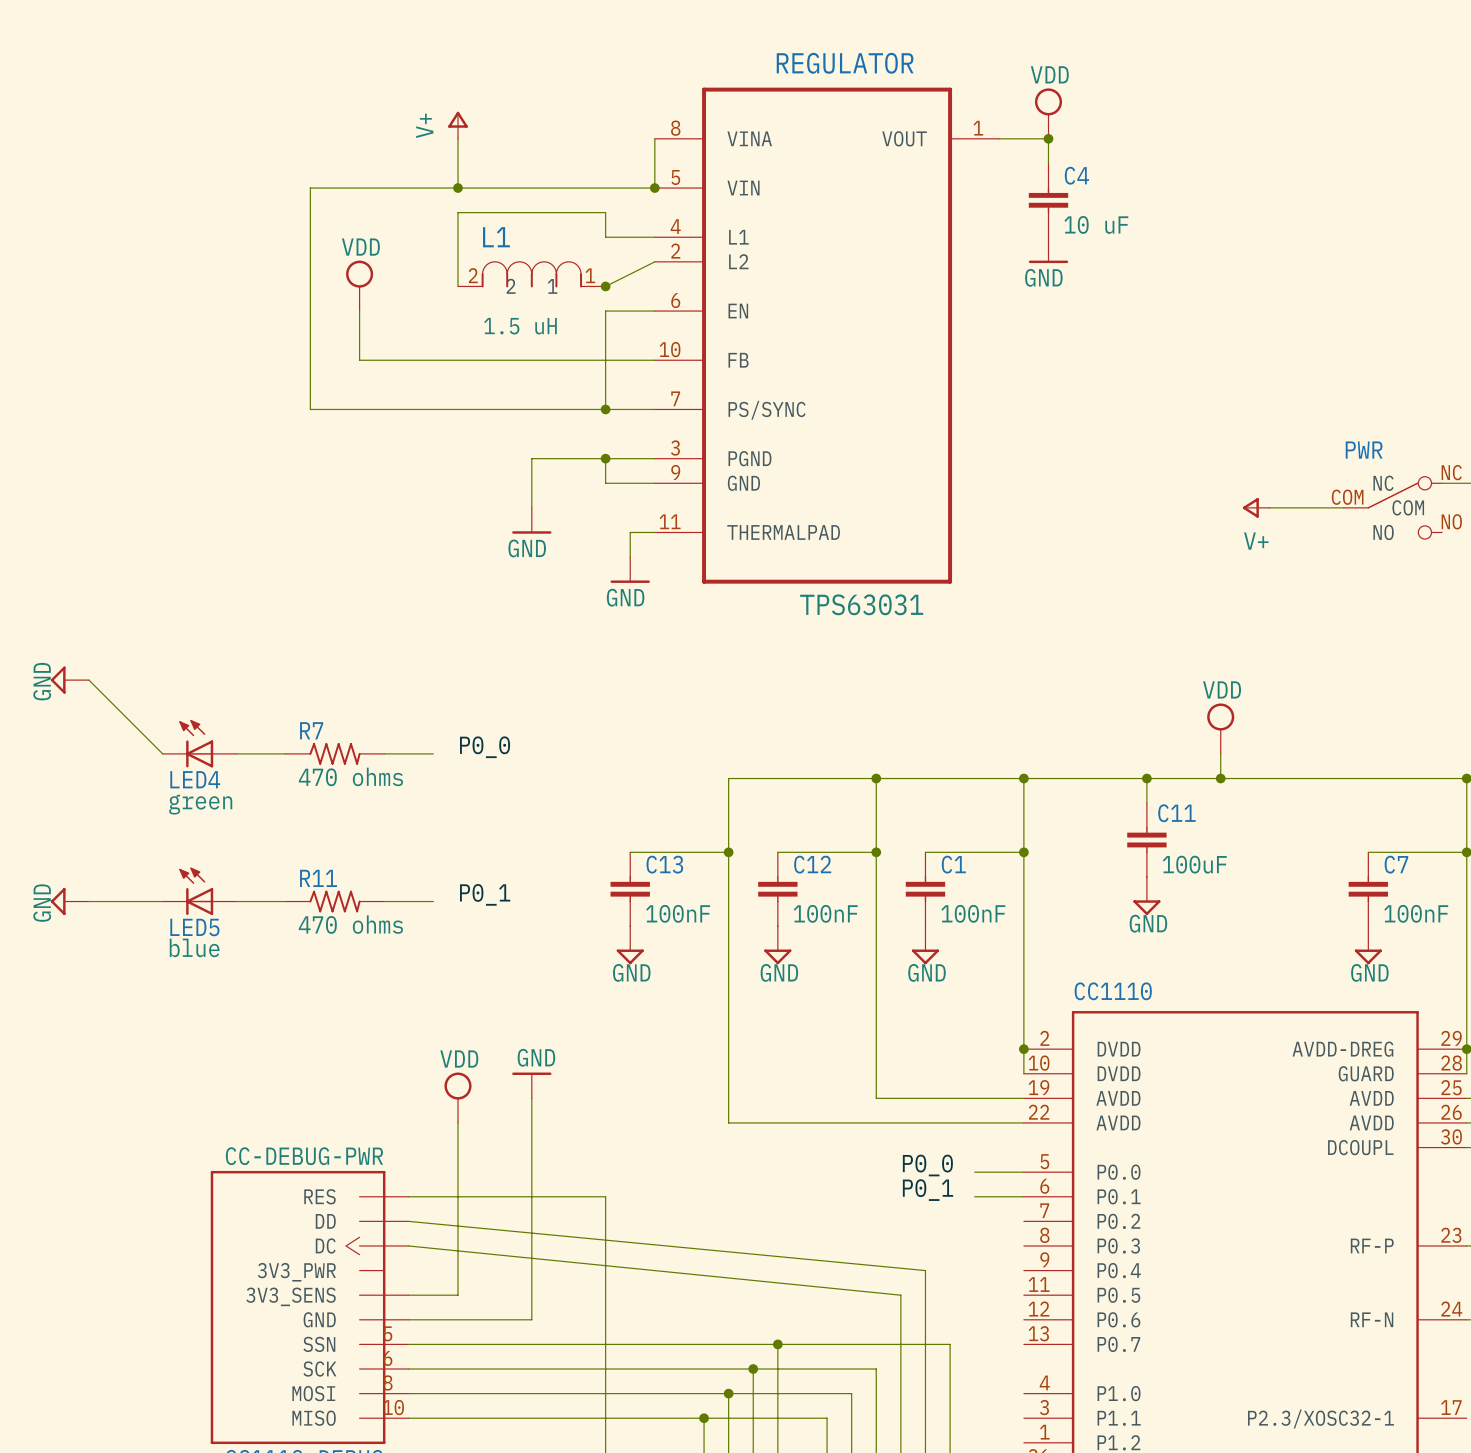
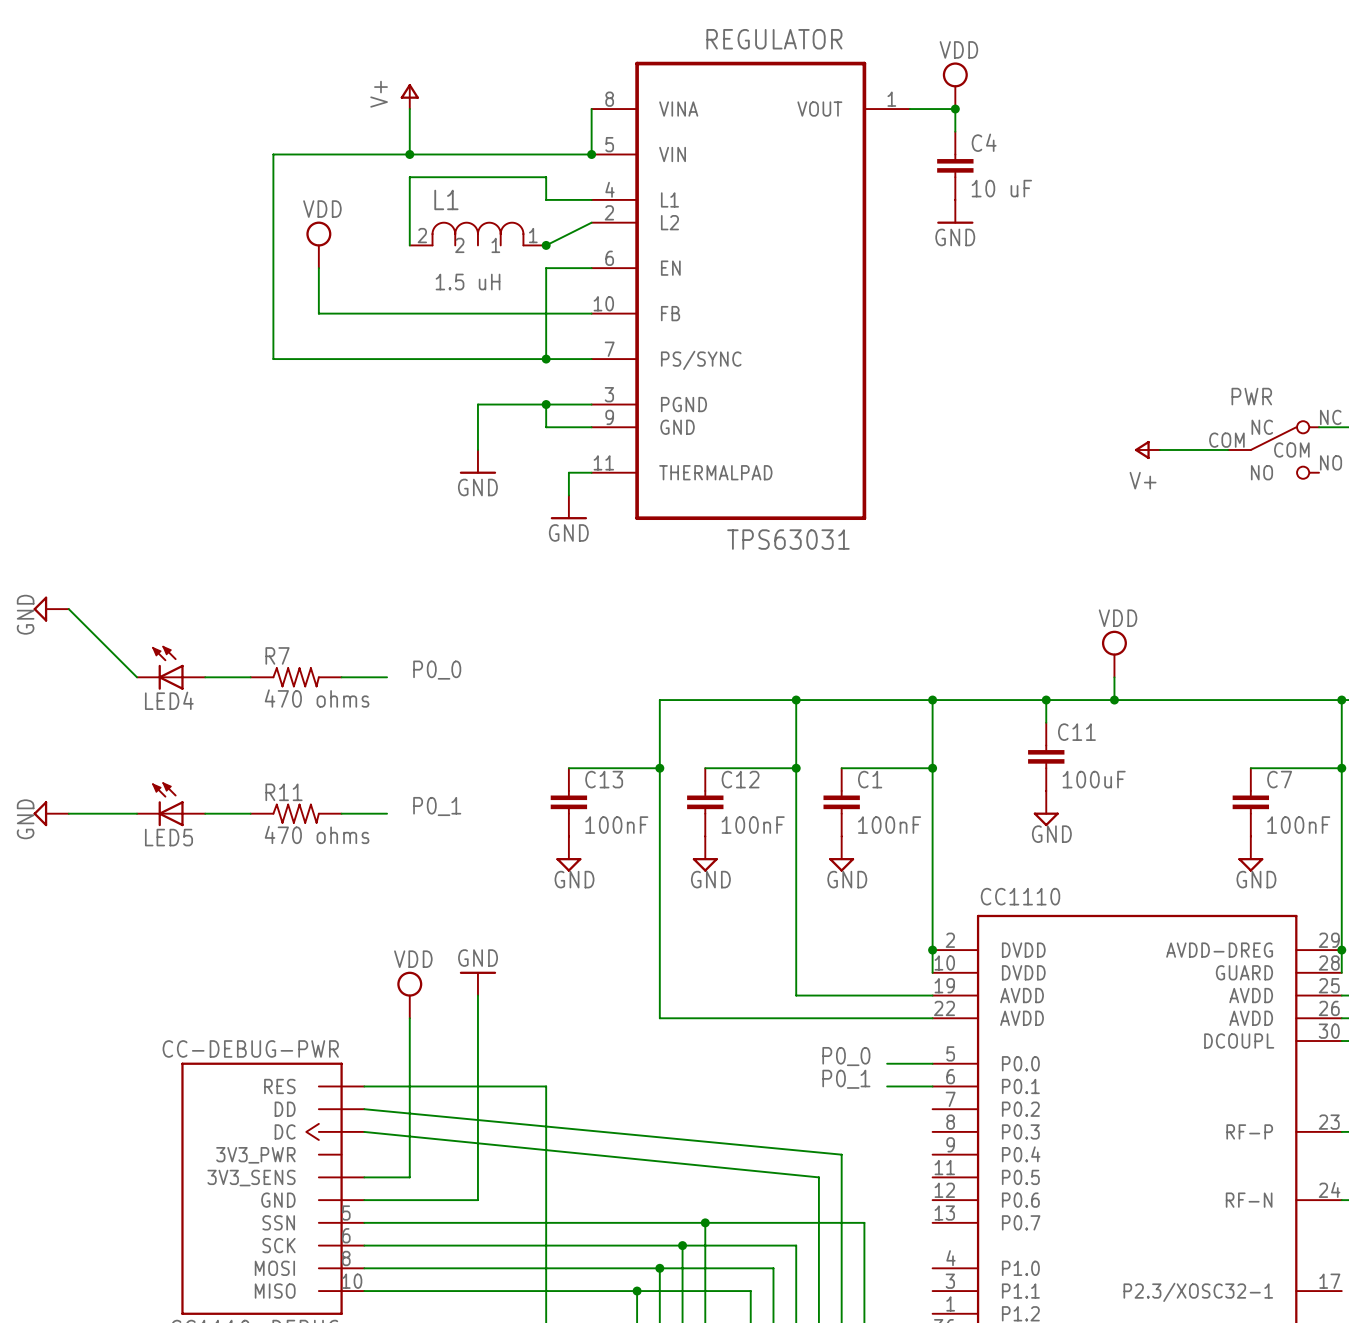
LED4 value: green (200, 804) -> none
LED5 value: blue (194, 947) -> none

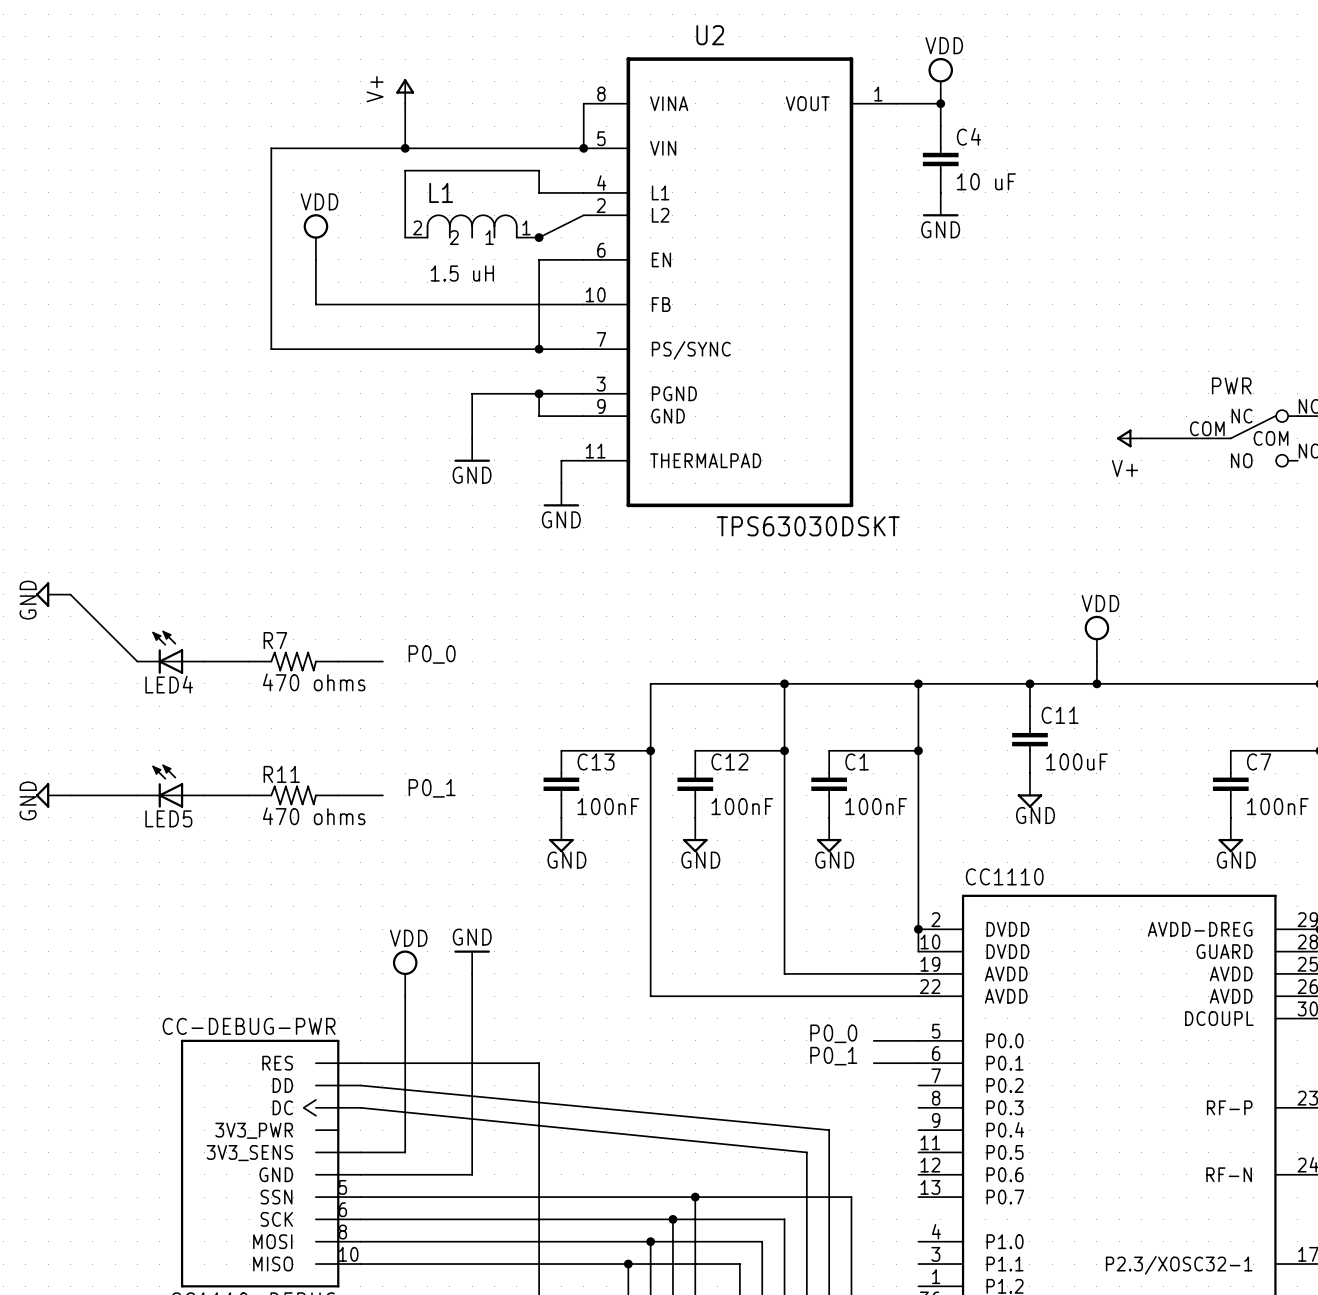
REGULATOR name: REGULATOR (774, 39) -> U2 (710, 35)
REGULATOR value: TPS63031 (788, 539) -> TPS63030DSKT (808, 526)

